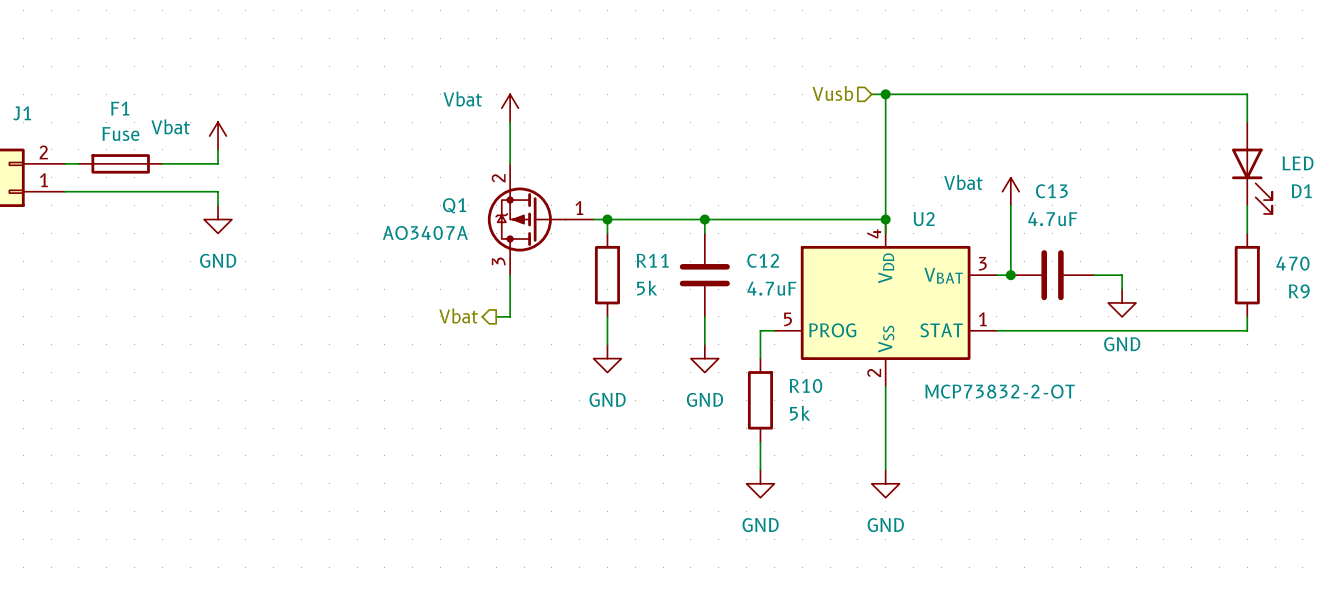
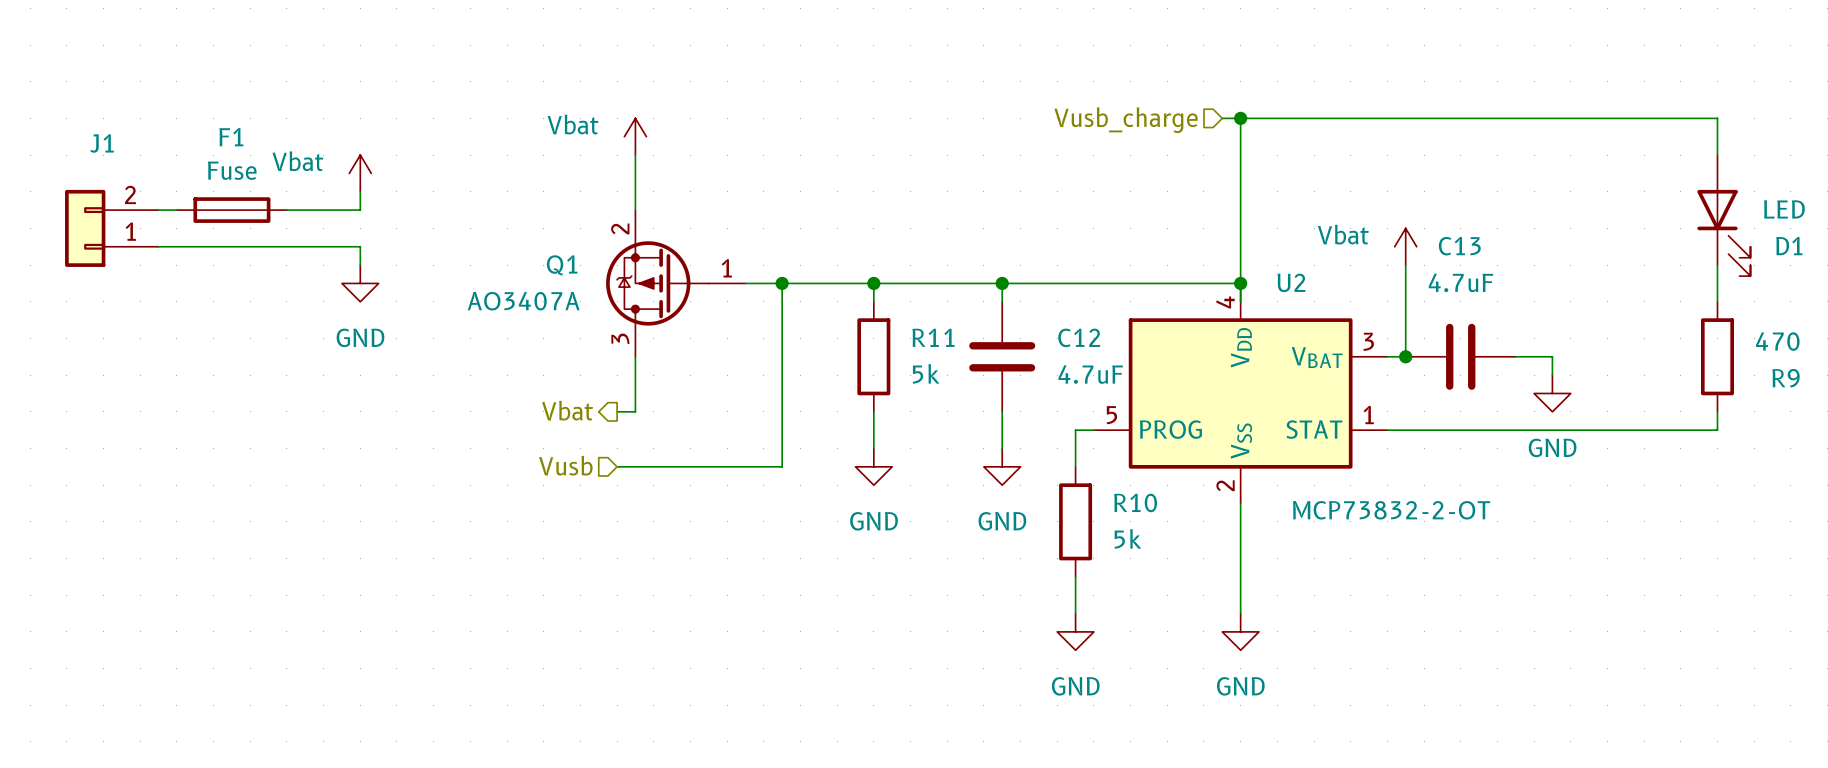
hierarchical label: Vusb (832, 93) -> Vusb_charge (1126, 120)
power symbol position: Vbat (510, 108) -> Vbat (635, 136)
wire: (510, 122) (510, 163) -> (635, 155) (635, 210)
wire: none -> (782, 283) (782, 466) (617, 466)
junction: none -> (782, 283)
Q1 position: (540, 219) -> (675, 283)
wire: (510, 275) (510, 316) (496, 316) -> (635, 356) (635, 411) (617, 411)
hierarchical label position: Vbat (458, 316) -> Vbat (567, 410)
hierarchical label: none -> Vusb (565, 465)

